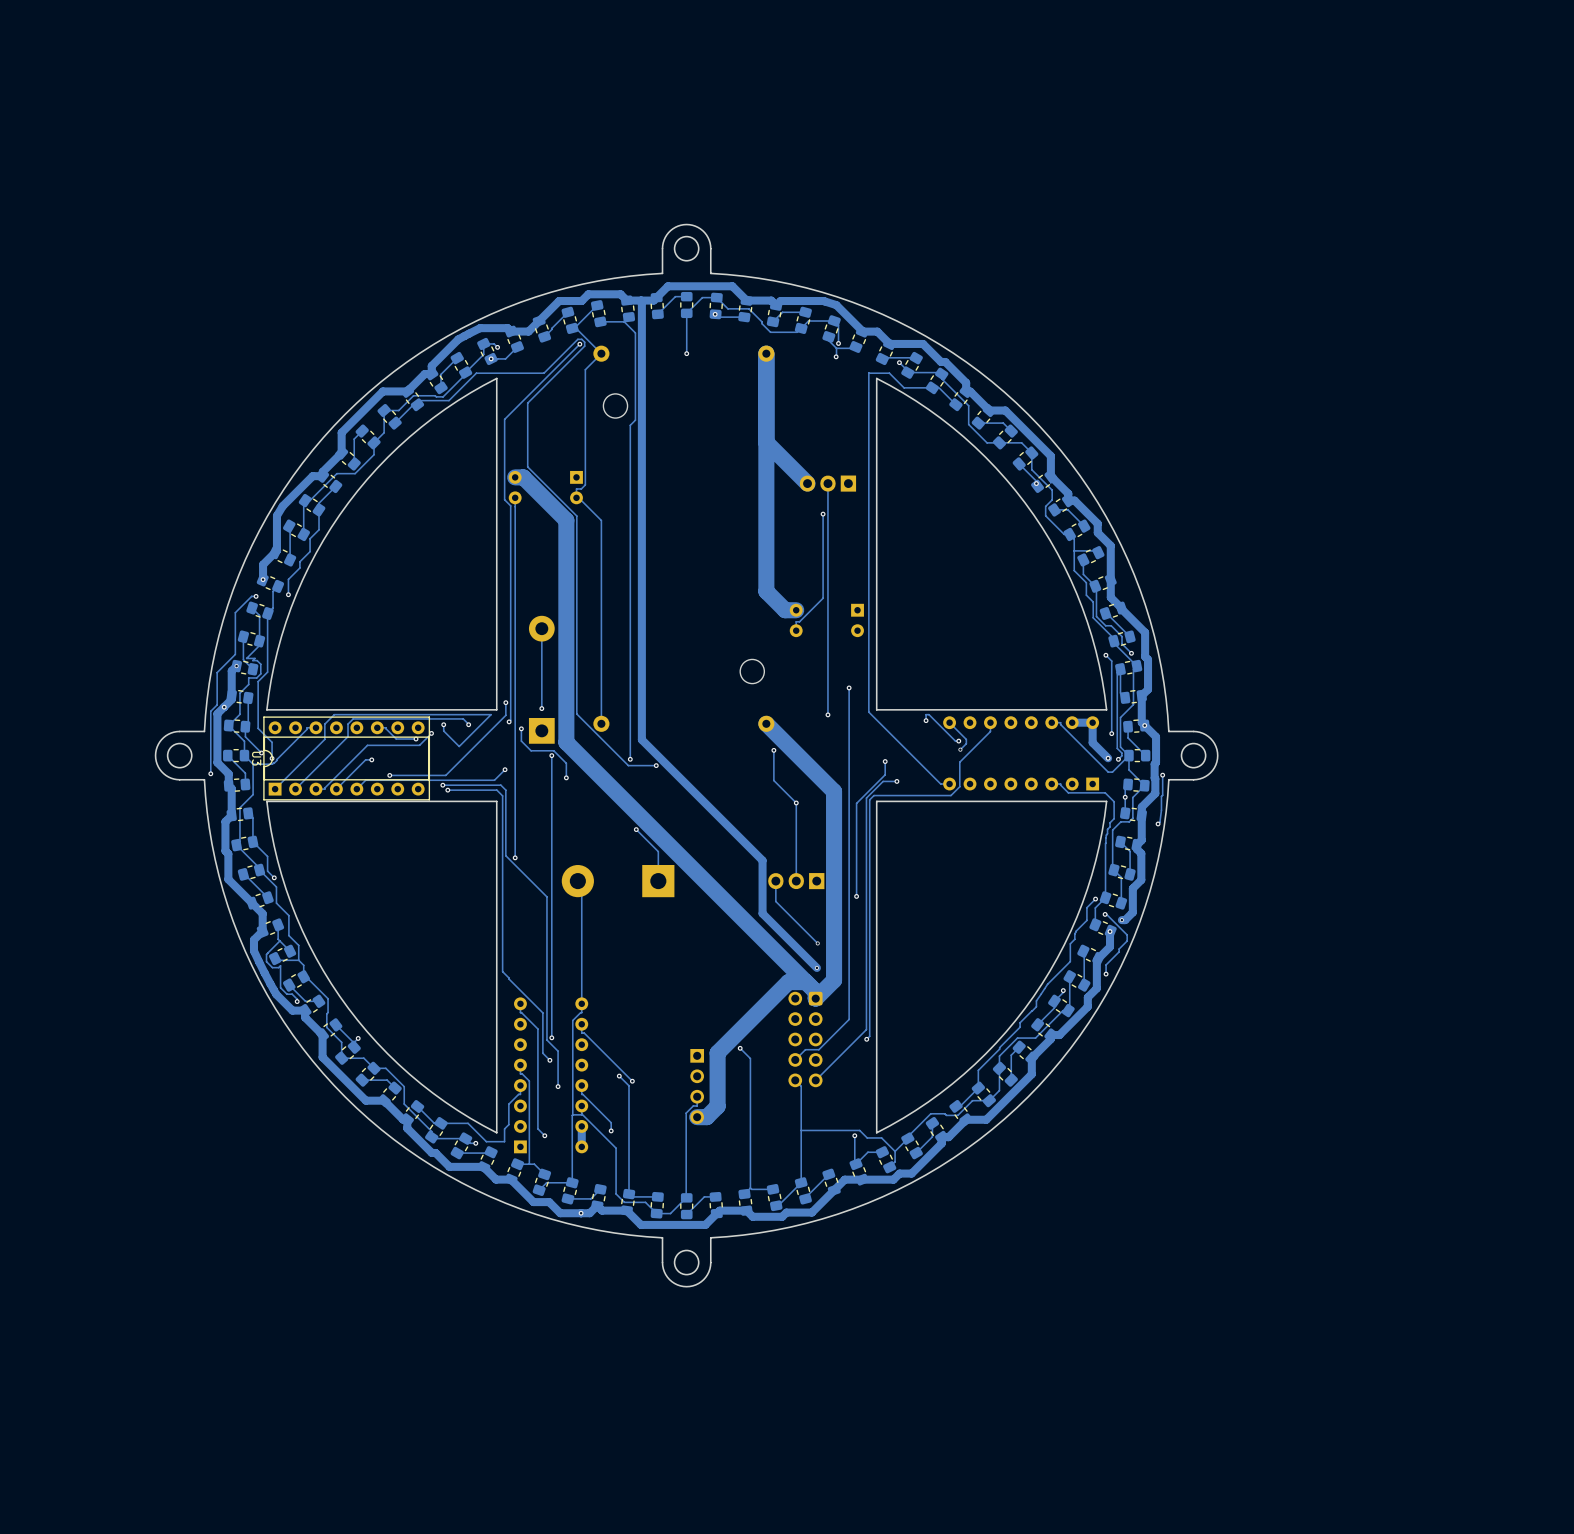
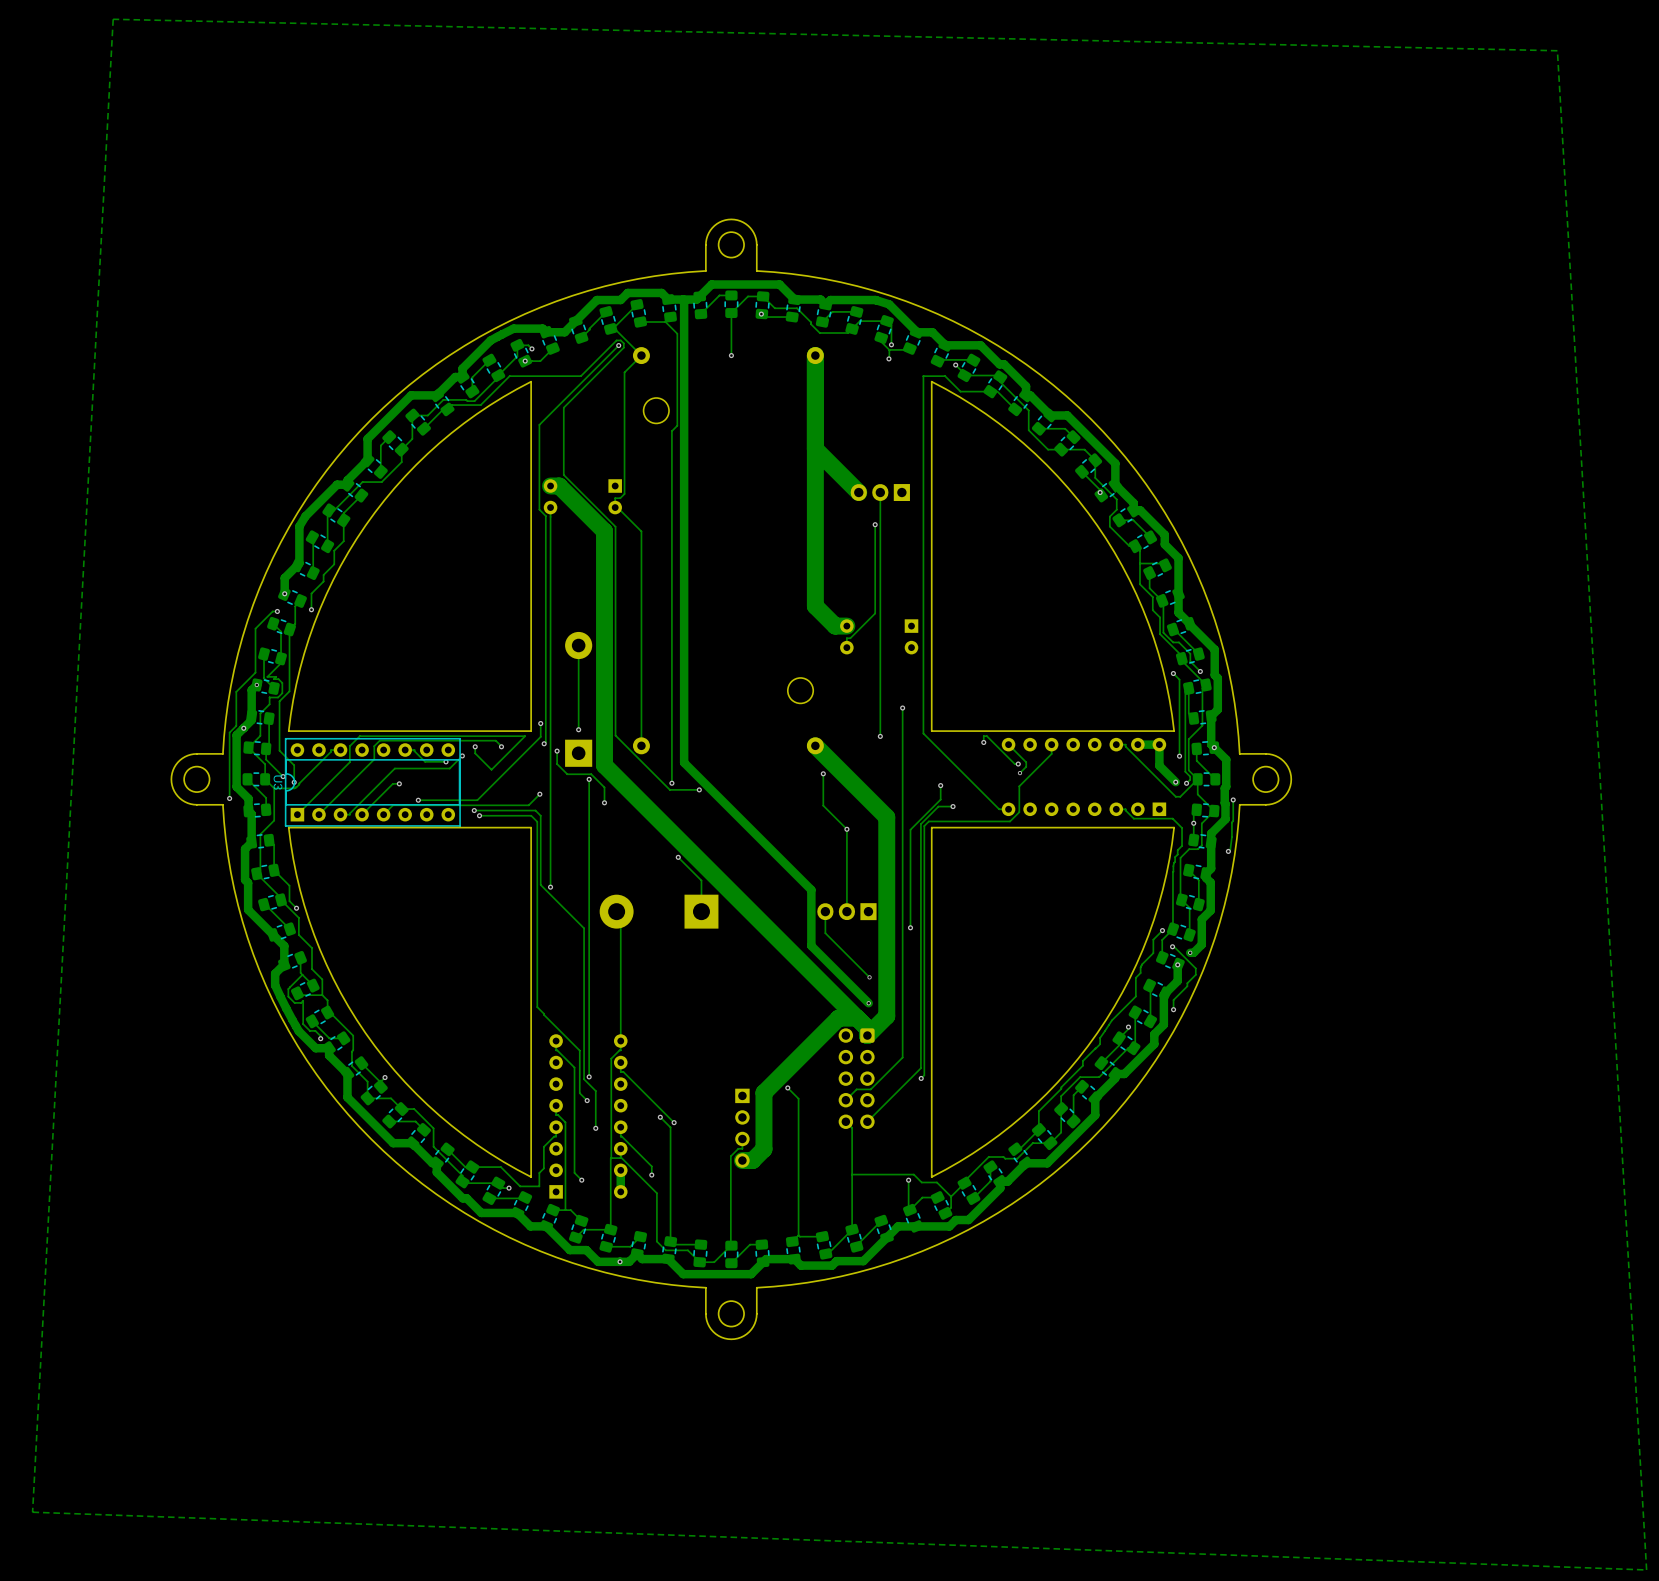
zone outline: none -> (113, 19) (1557, 50) (1646, 1569) (32, 1512) (113, 19)

